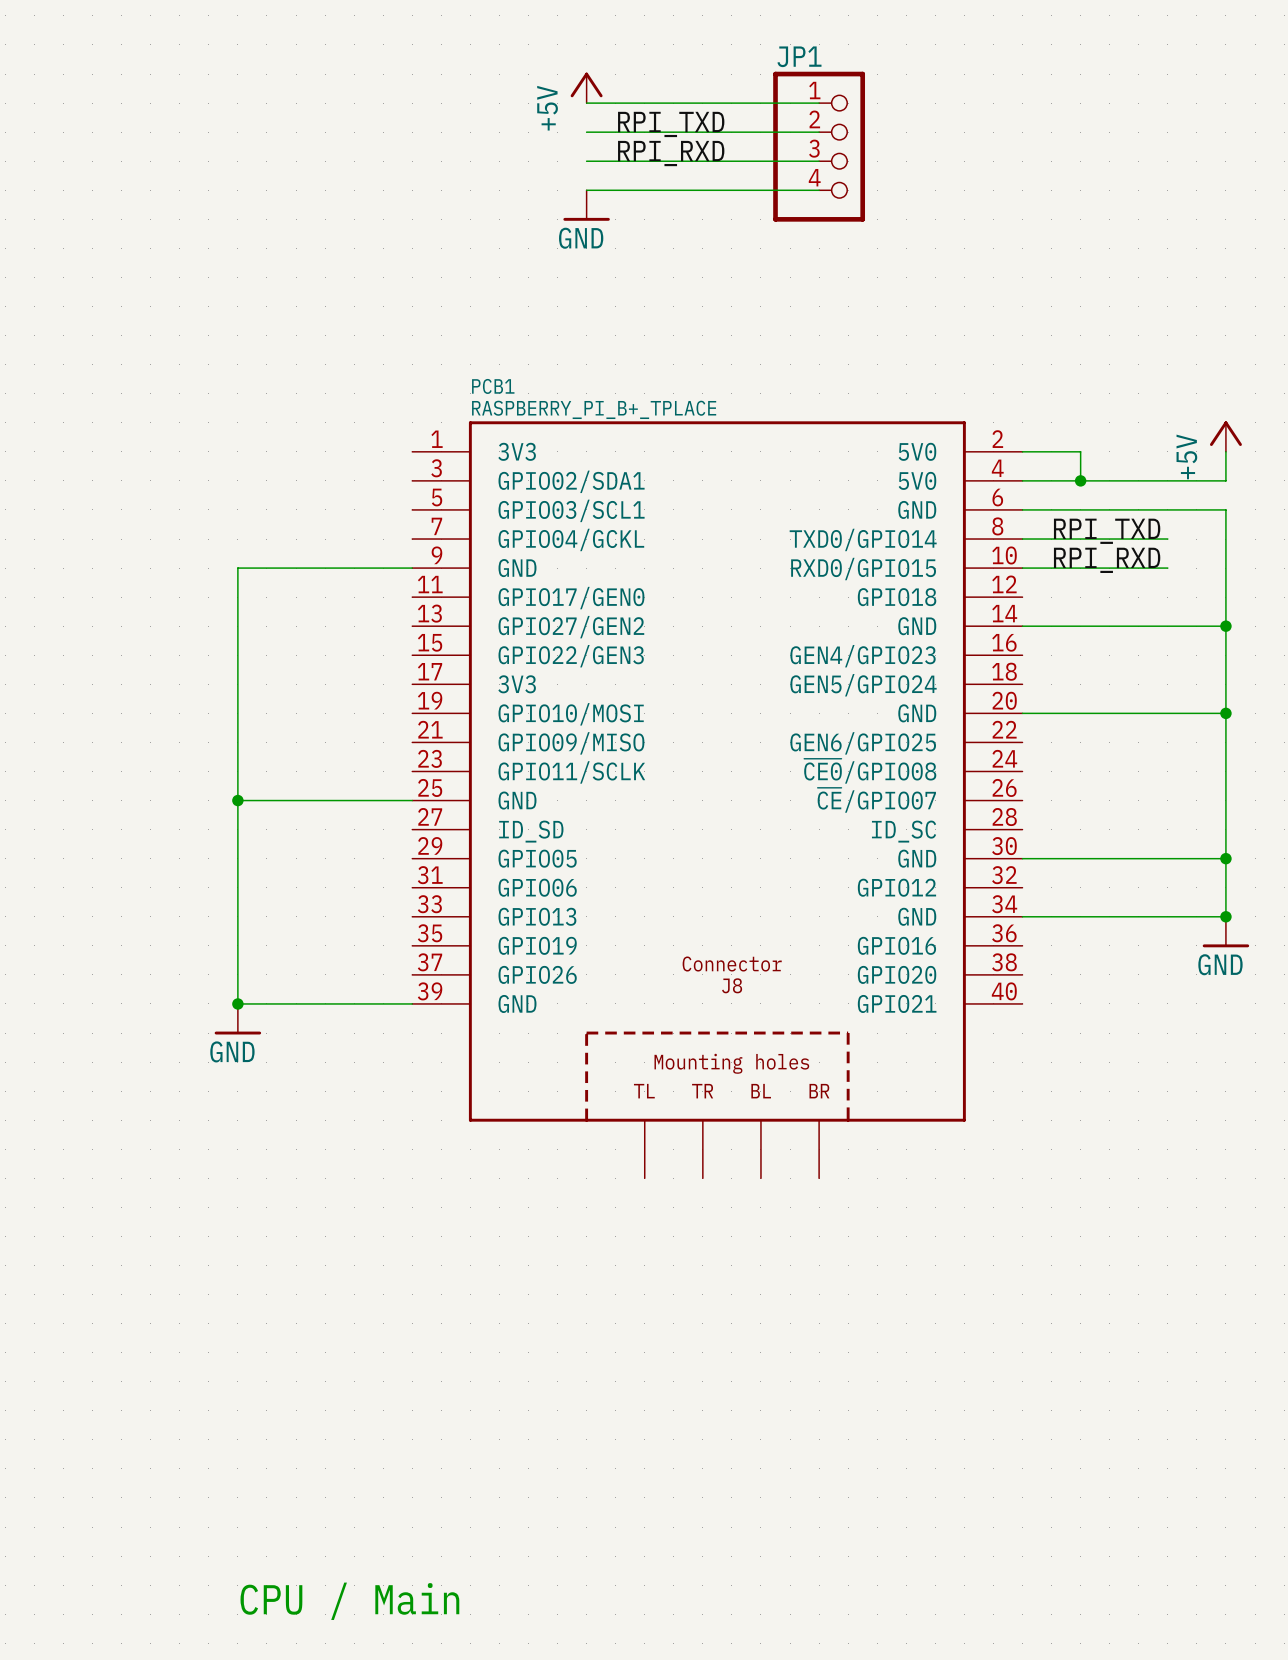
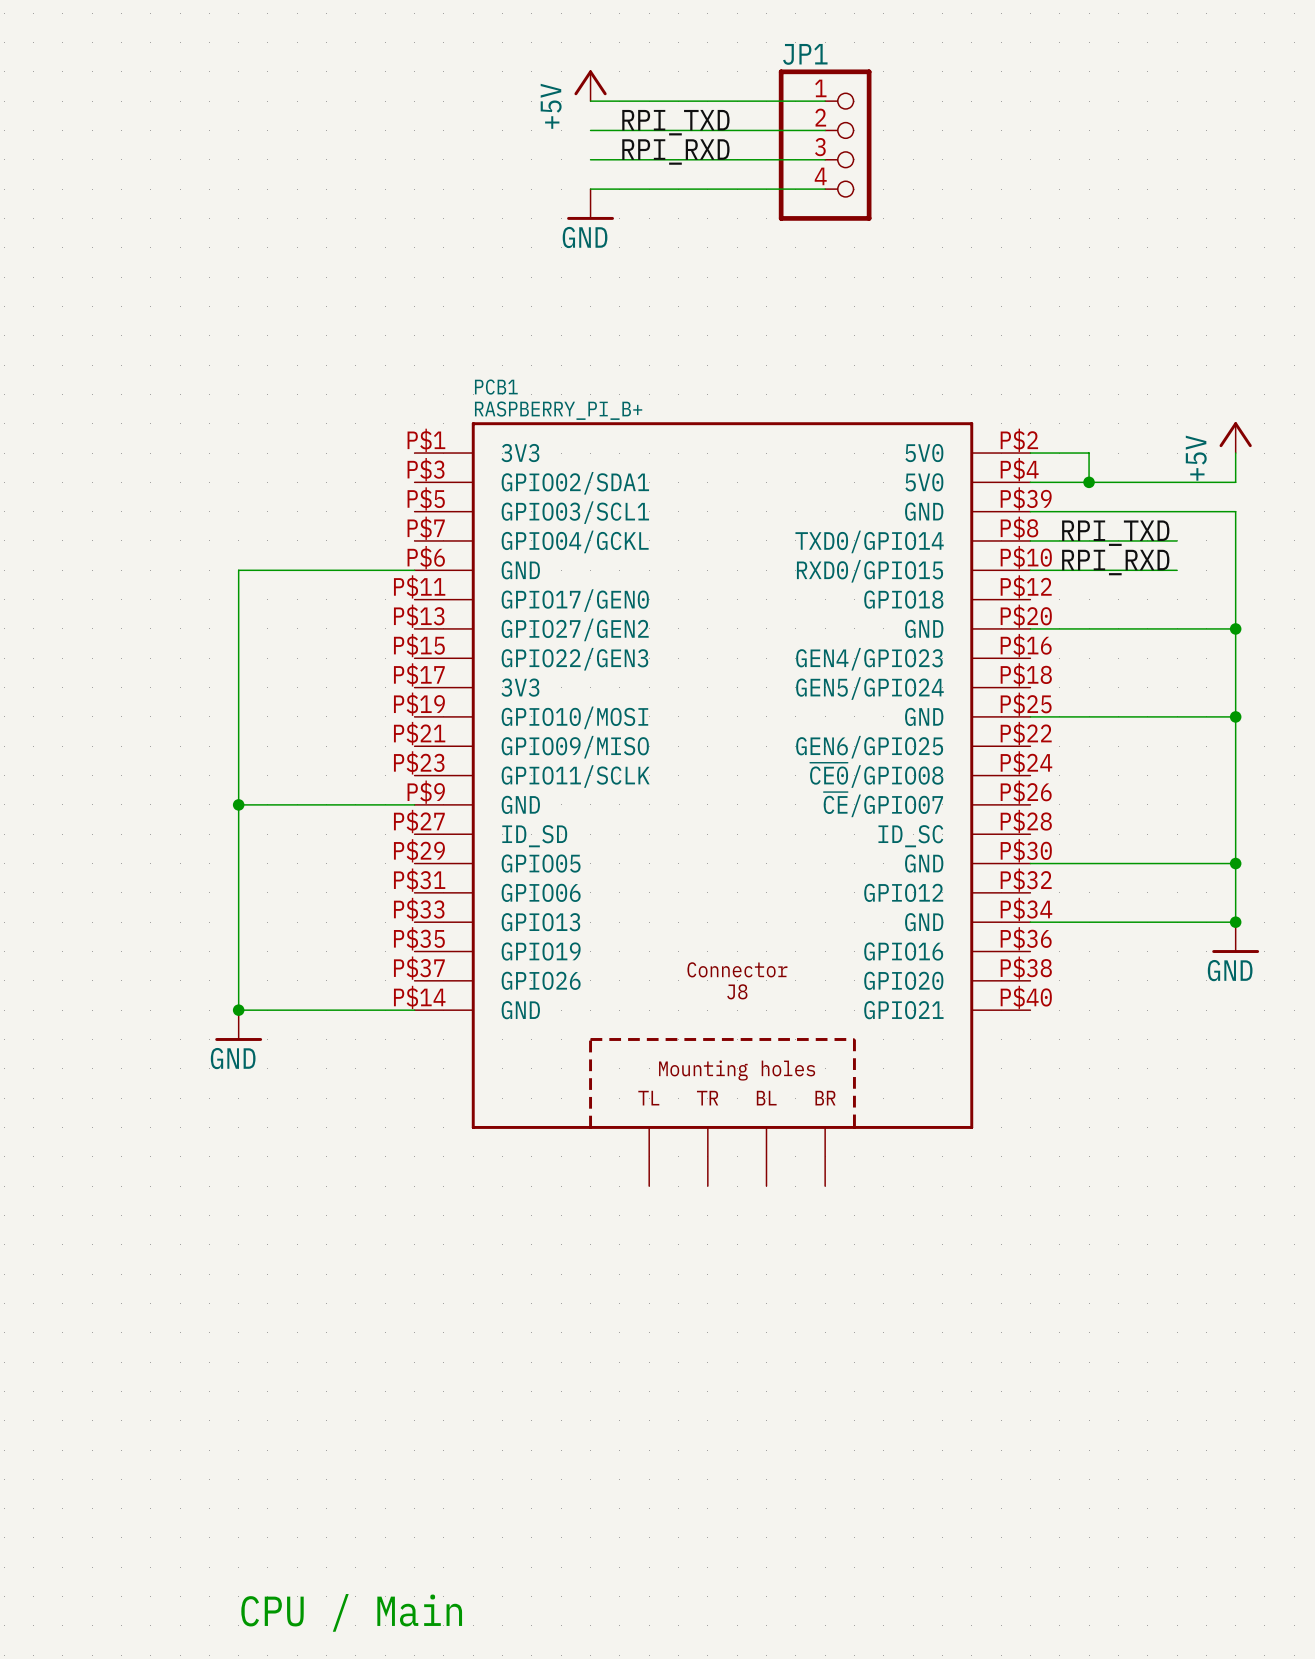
PCB1 value: RASPBERRY_PI_B+_TPLACE (594, 409) -> RASPBERRY_PI_B+ (558, 410)
PCB1 symbol: [412, 421, 1023, 1179] -> [414, 422, 1031, 1187]

